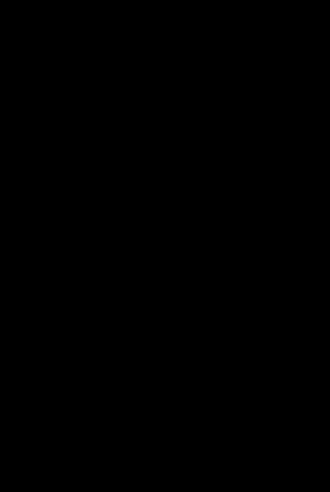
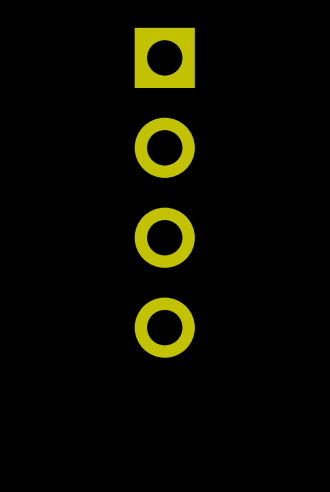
part: none -> (164, 192)

